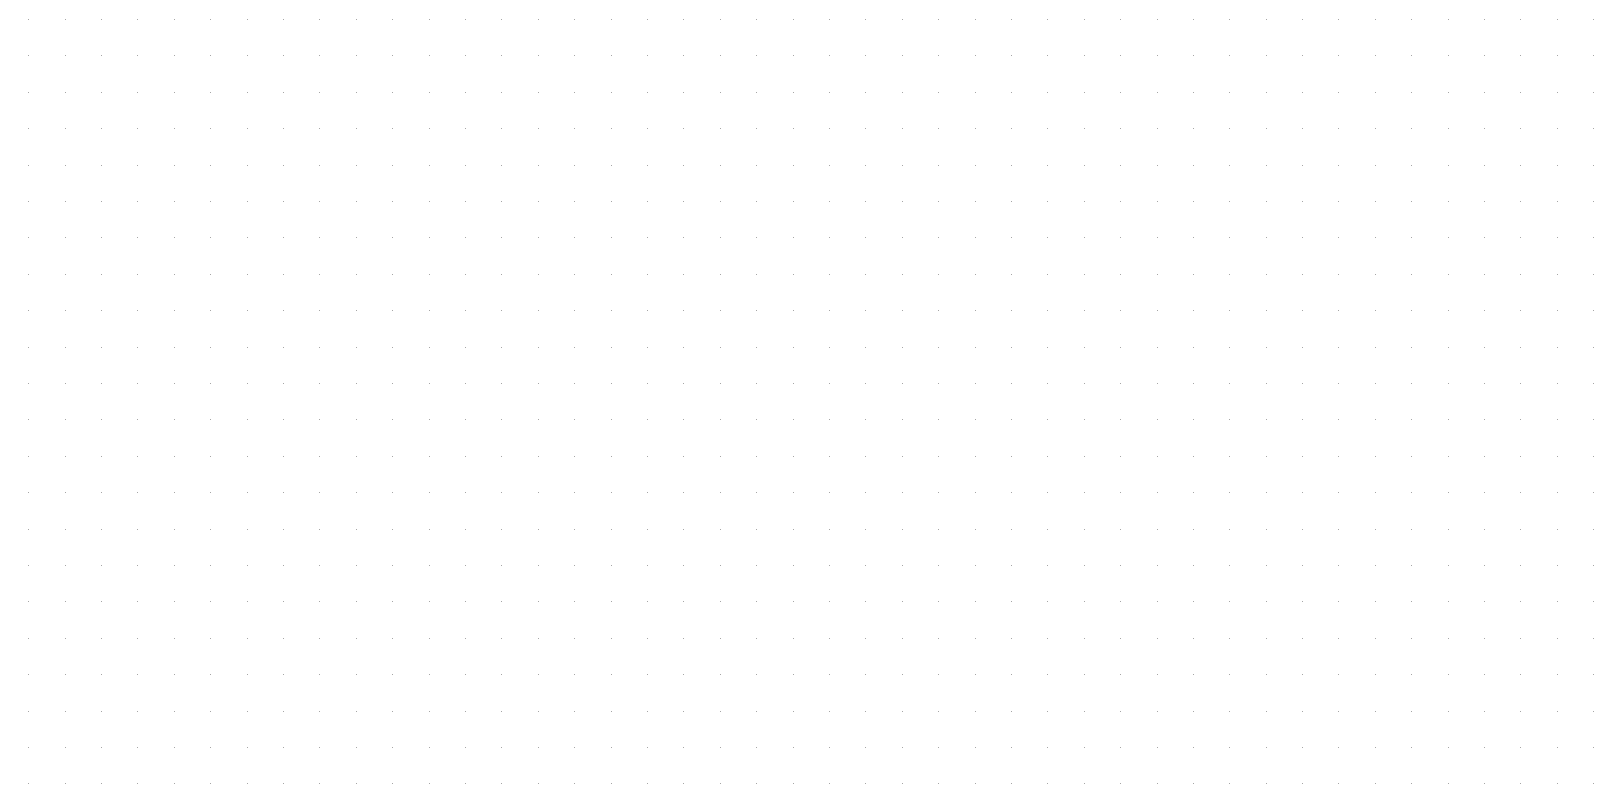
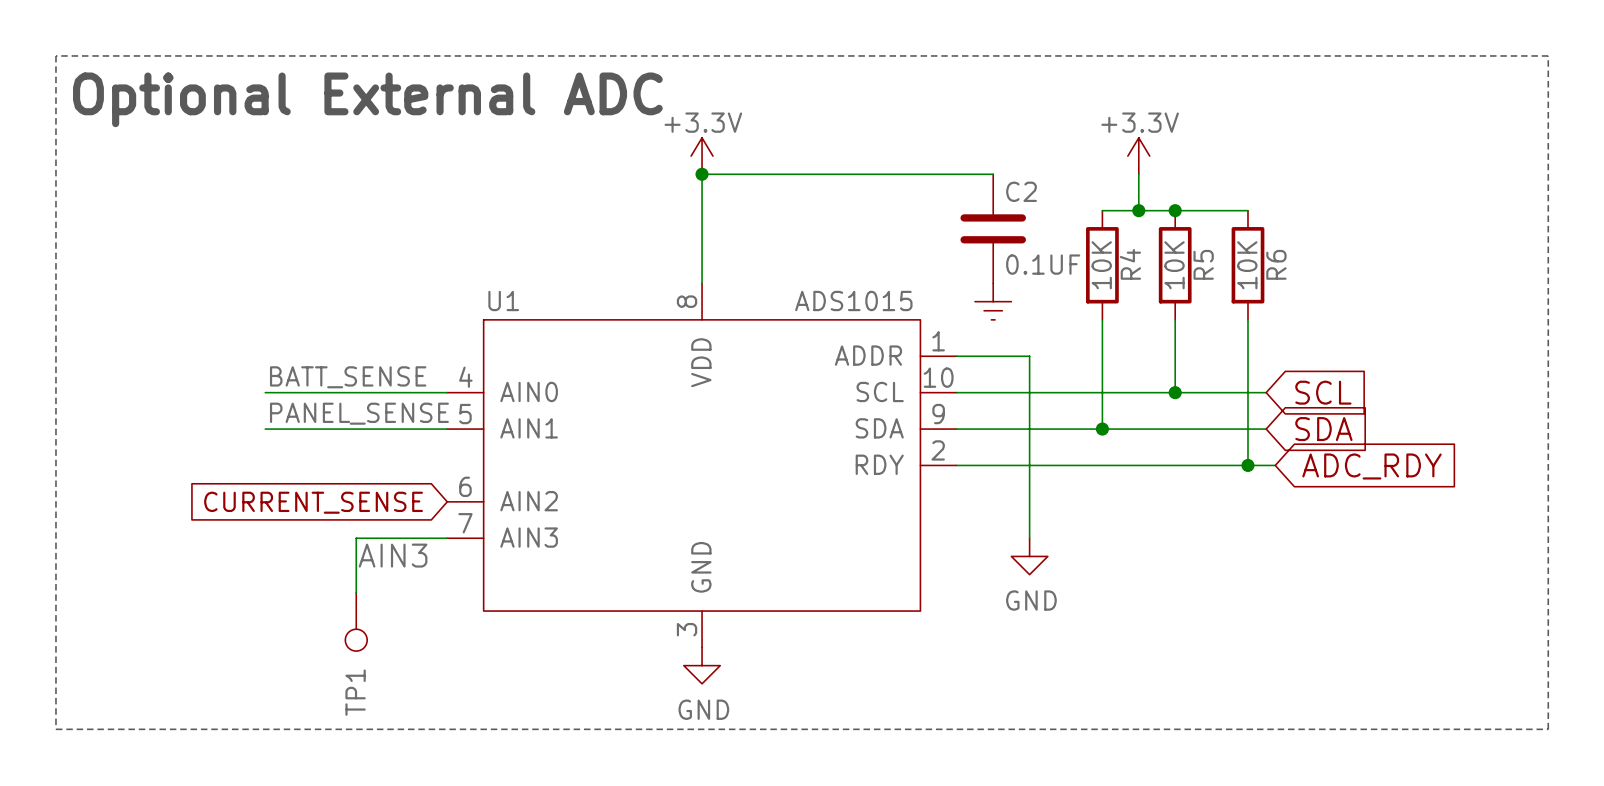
line: none -> (55, 55) (55, 729) (1548, 729) (1548, 55) (55, 55)
text: none -> Optional External ADC (367, 99)
power symbol: none -> +3.3V (702, 156)
power symbol: none -> +3.3V (1138, 156)
junction: none -> (702, 174)
wire: none -> (993, 174) (702, 174) (702, 283)
wire: none -> (1138, 174) (1138, 210)
wire: none -> (1102, 210) (1247, 210)
junction: none -> (1138, 210)
junction: none -> (1175, 210)
C2: none -> 0.1UF (993, 228)
R4: none -> 10K (1102, 265)
R5: none -> 10K (1175, 265)
R6: none -> 10K (1247, 265)
power symbol: none -> (993, 301)
wire: none -> (1102, 319) (1102, 429)
wire: none -> (1175, 319) (1175, 392)
wire: none -> (1247, 319) (1247, 465)
wire: none -> (956, 356) (1029, 356) (1029, 538)
label: none -> BATT_SENSE (348, 377)
wire: none -> (265, 392) (447, 392)
wire: none -> (956, 392) (1266, 392)
junction: none -> (1175, 392)
global label: none -> SCL (1323, 392)
label: none -> PANEL_SENSE (359, 413)
wire: none -> (265, 429) (447, 429)
wire: none -> (956, 429) (1266, 429)
junction: none -> (1102, 429)
global label: none -> SDA (1323, 429)
U1: none -> ADS1015 (702, 465)
wire: none -> (956, 465) (1275, 465)
junction: none -> (1247, 465)
global label: none -> ADC_RDY (1372, 466)
global label: none -> CURRENT_SENSE (313, 502)
wire: none -> (447, 538) (356, 538) (356, 592)
label: none -> AIN3 (393, 555)
power symbol: none -> GND (1029, 556)
TP1: none -> (356, 621)
power symbol: none -> GND (702, 665)

